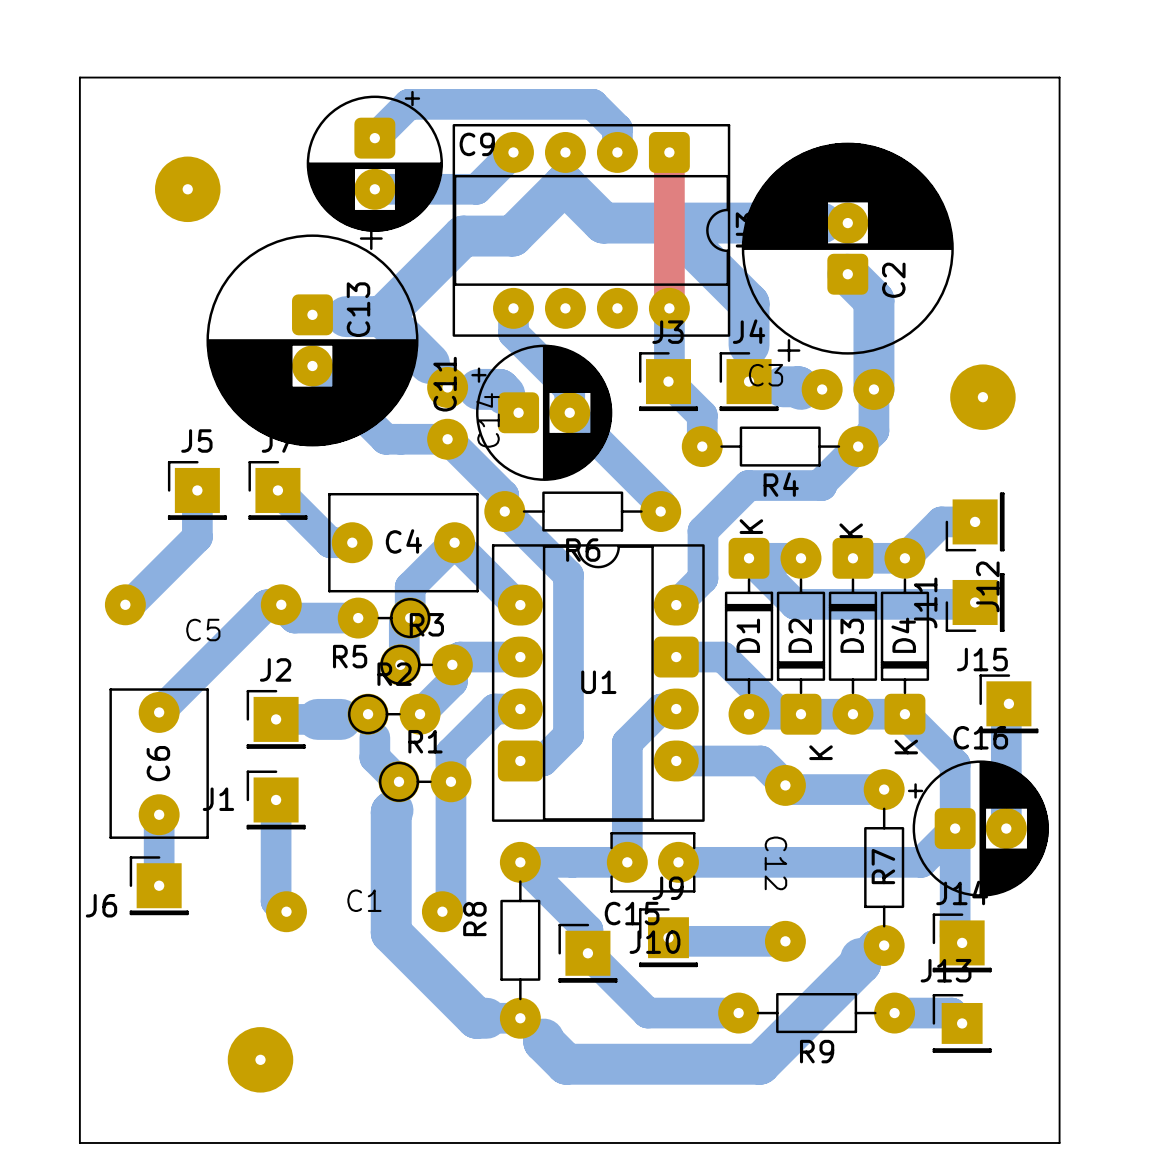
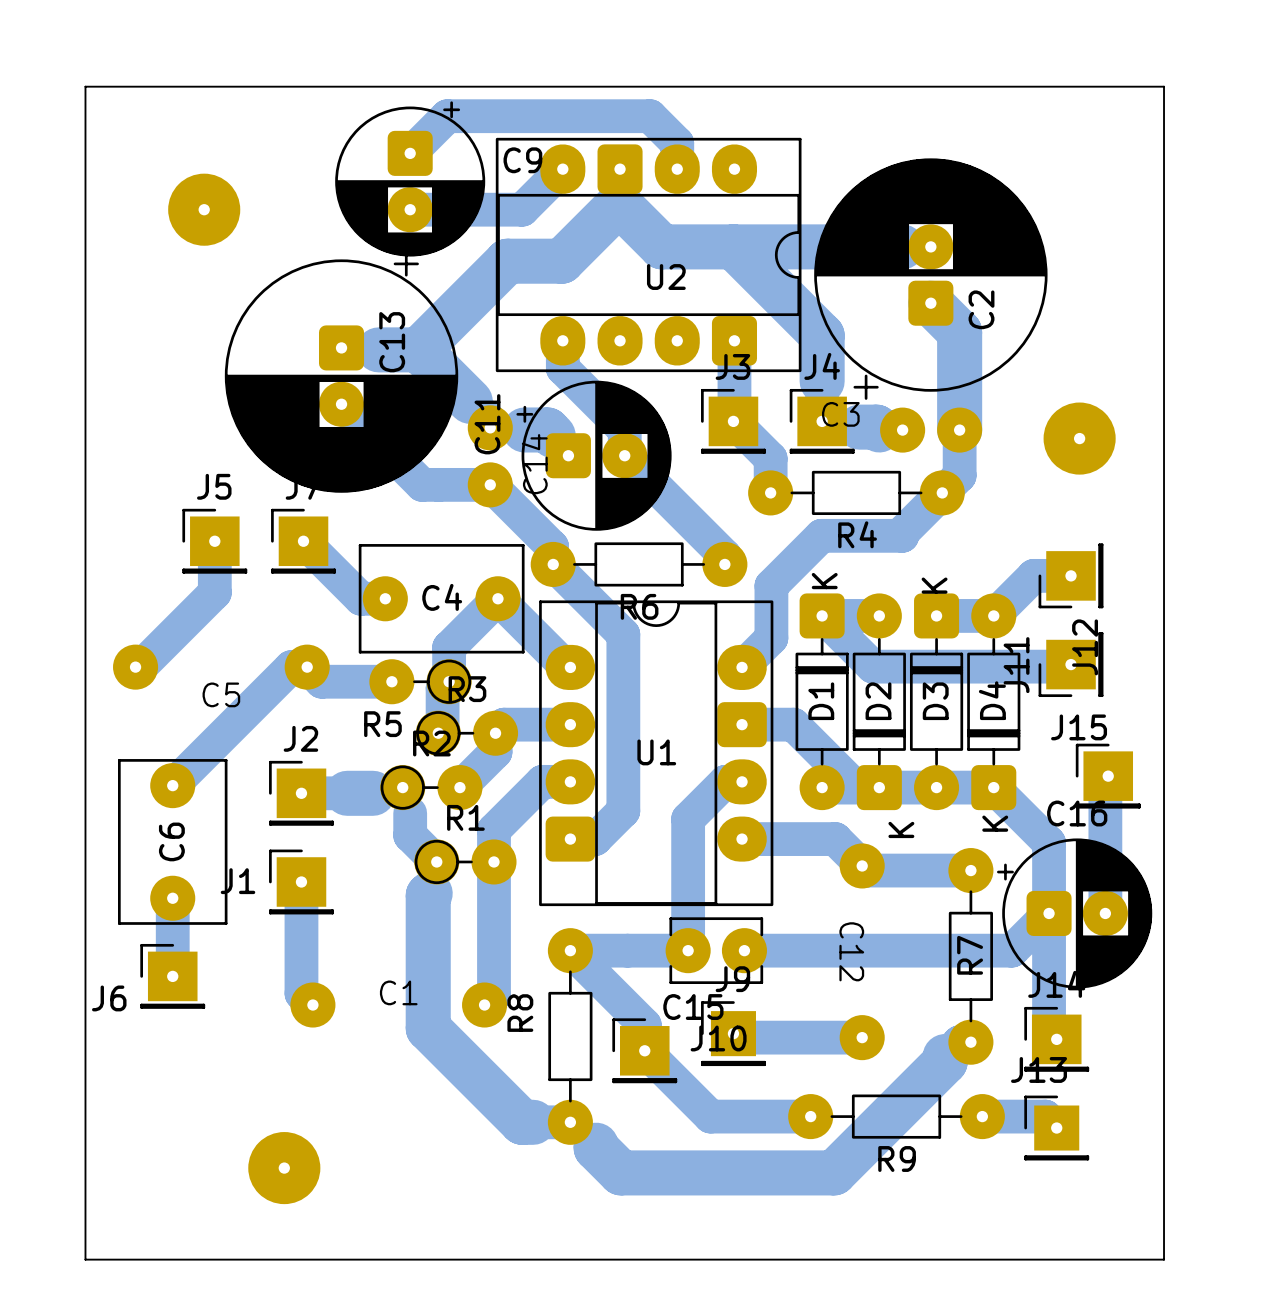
top track: (669, 152) (669, 308) -> none
part: (591, 230) -> none
U2: none -> (648, 254)

